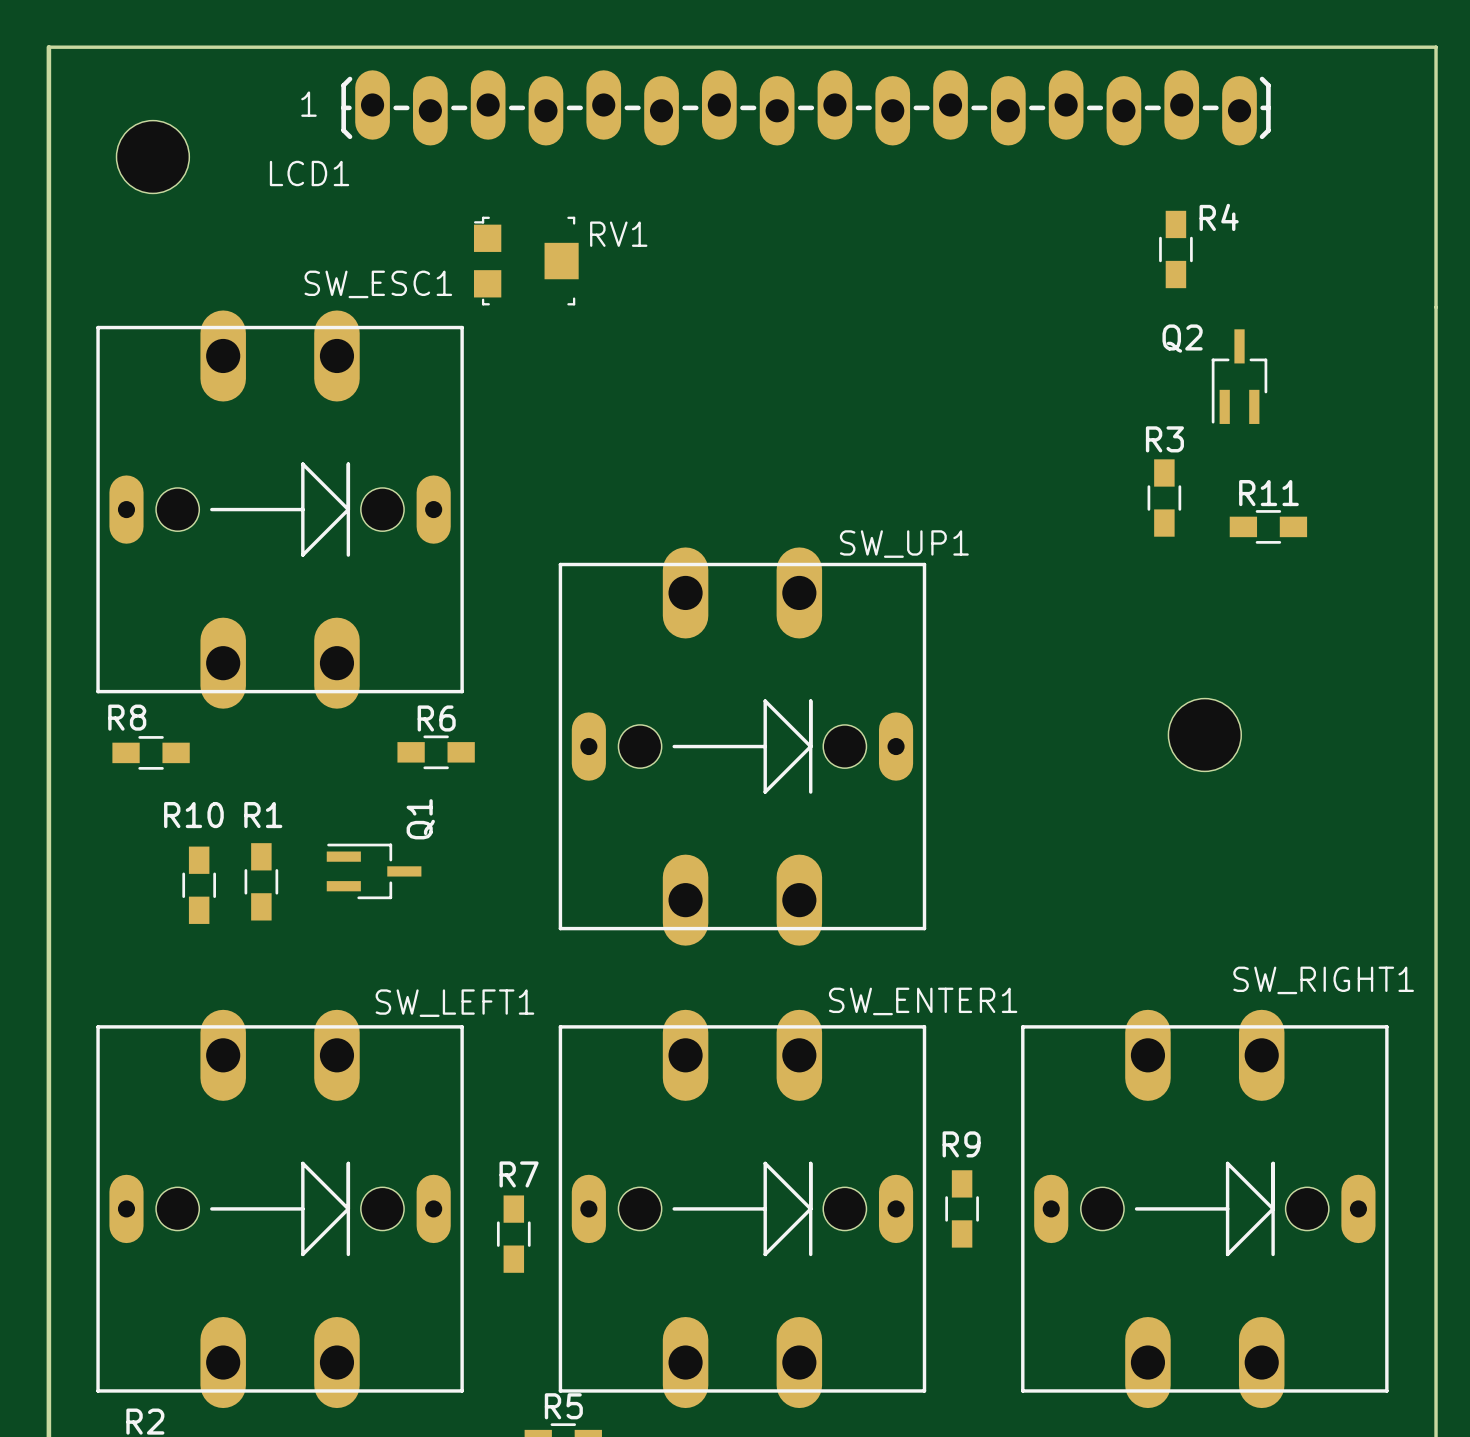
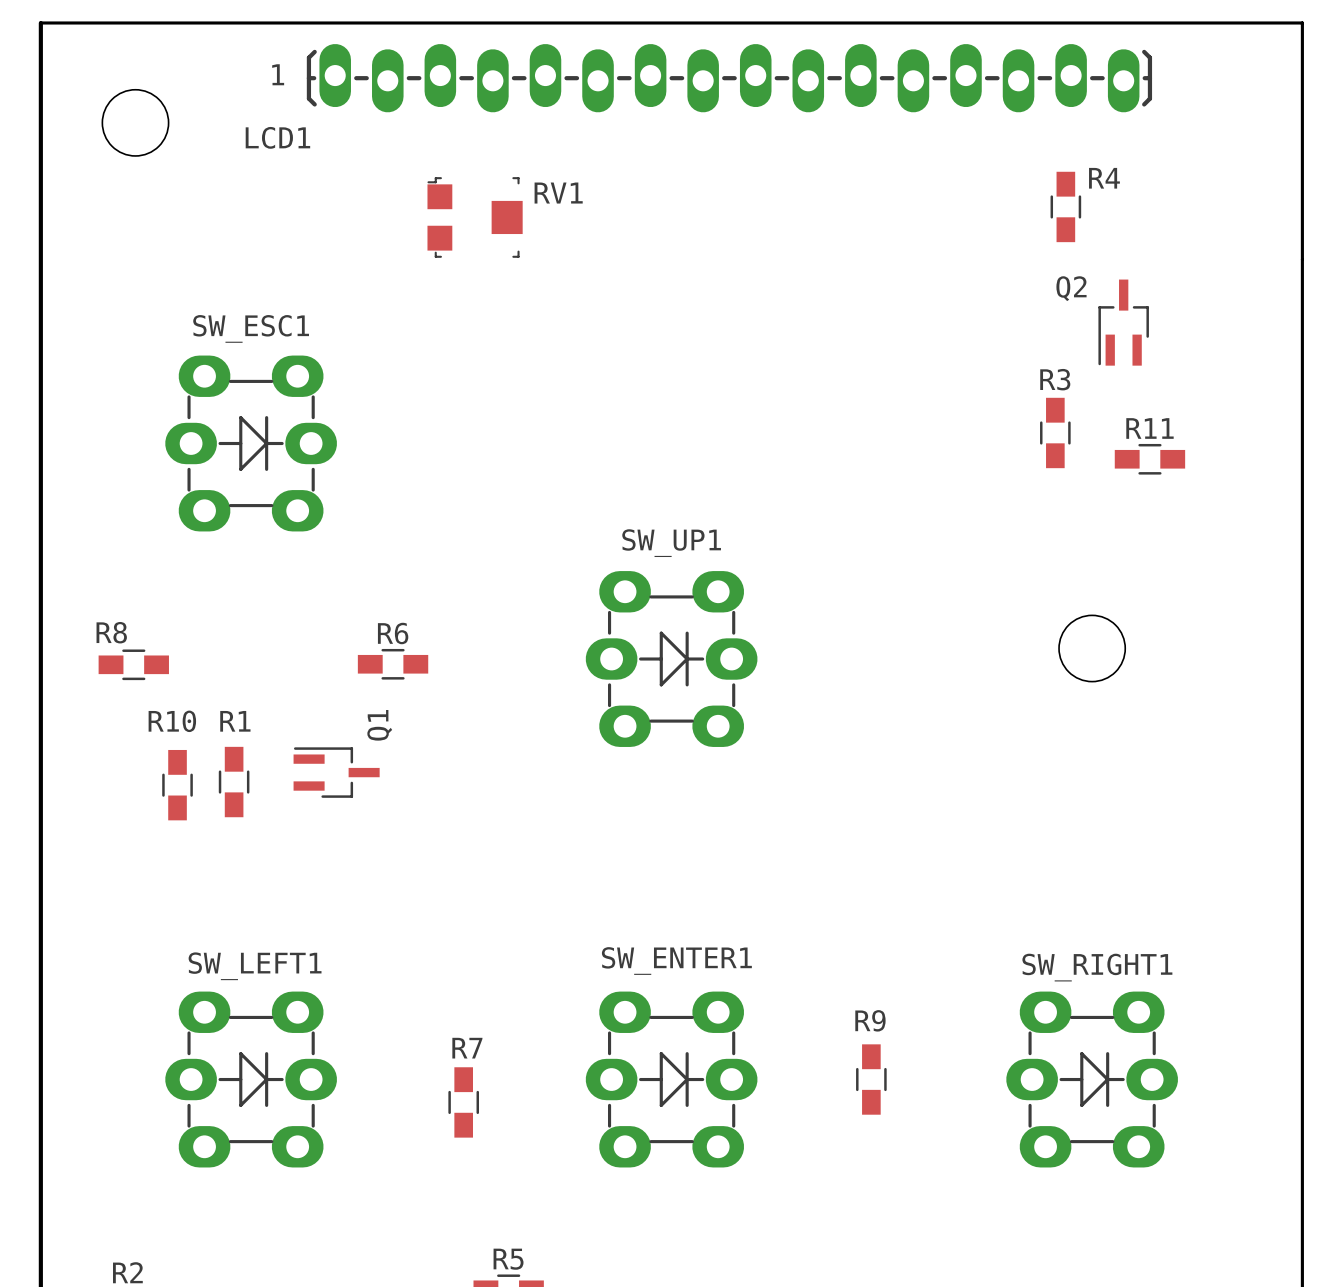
SW_ESC1 name position: SW_ESC1 (378, 284) -> SW_ESC1 (251, 328)
SW_ESC1 footprint: [96, 310, 464, 709] -> [165, 355, 337, 532]
SW_UP1 name position: SW_UP1 (904, 544) -> SW_UP1 (671, 543)
SW_UP1 footprint: [558, 547, 927, 946] -> [585, 571, 758, 747]
SW_RIGHT1 name position: SW_RIGHT1 (1323, 980) -> SW_RIGHT1 (1097, 967)
SW_ENTER1 name position: SW_ENTER1 (923, 1001) -> SW_ENTER1 (676, 961)
SW_LEFT1 name position: SW_LEFT1 (454, 1003) -> SW_LEFT1 (255, 966)
SW_LEFT1 footprint: [96, 1009, 464, 1409] -> [165, 991, 337, 1168]
SW_ENTER1 footprint: [558, 1009, 927, 1409] -> [585, 991, 758, 1168]
SW_RIGHT1 footprint: [1021, 1009, 1389, 1409] -> [1006, 991, 1179, 1168]

